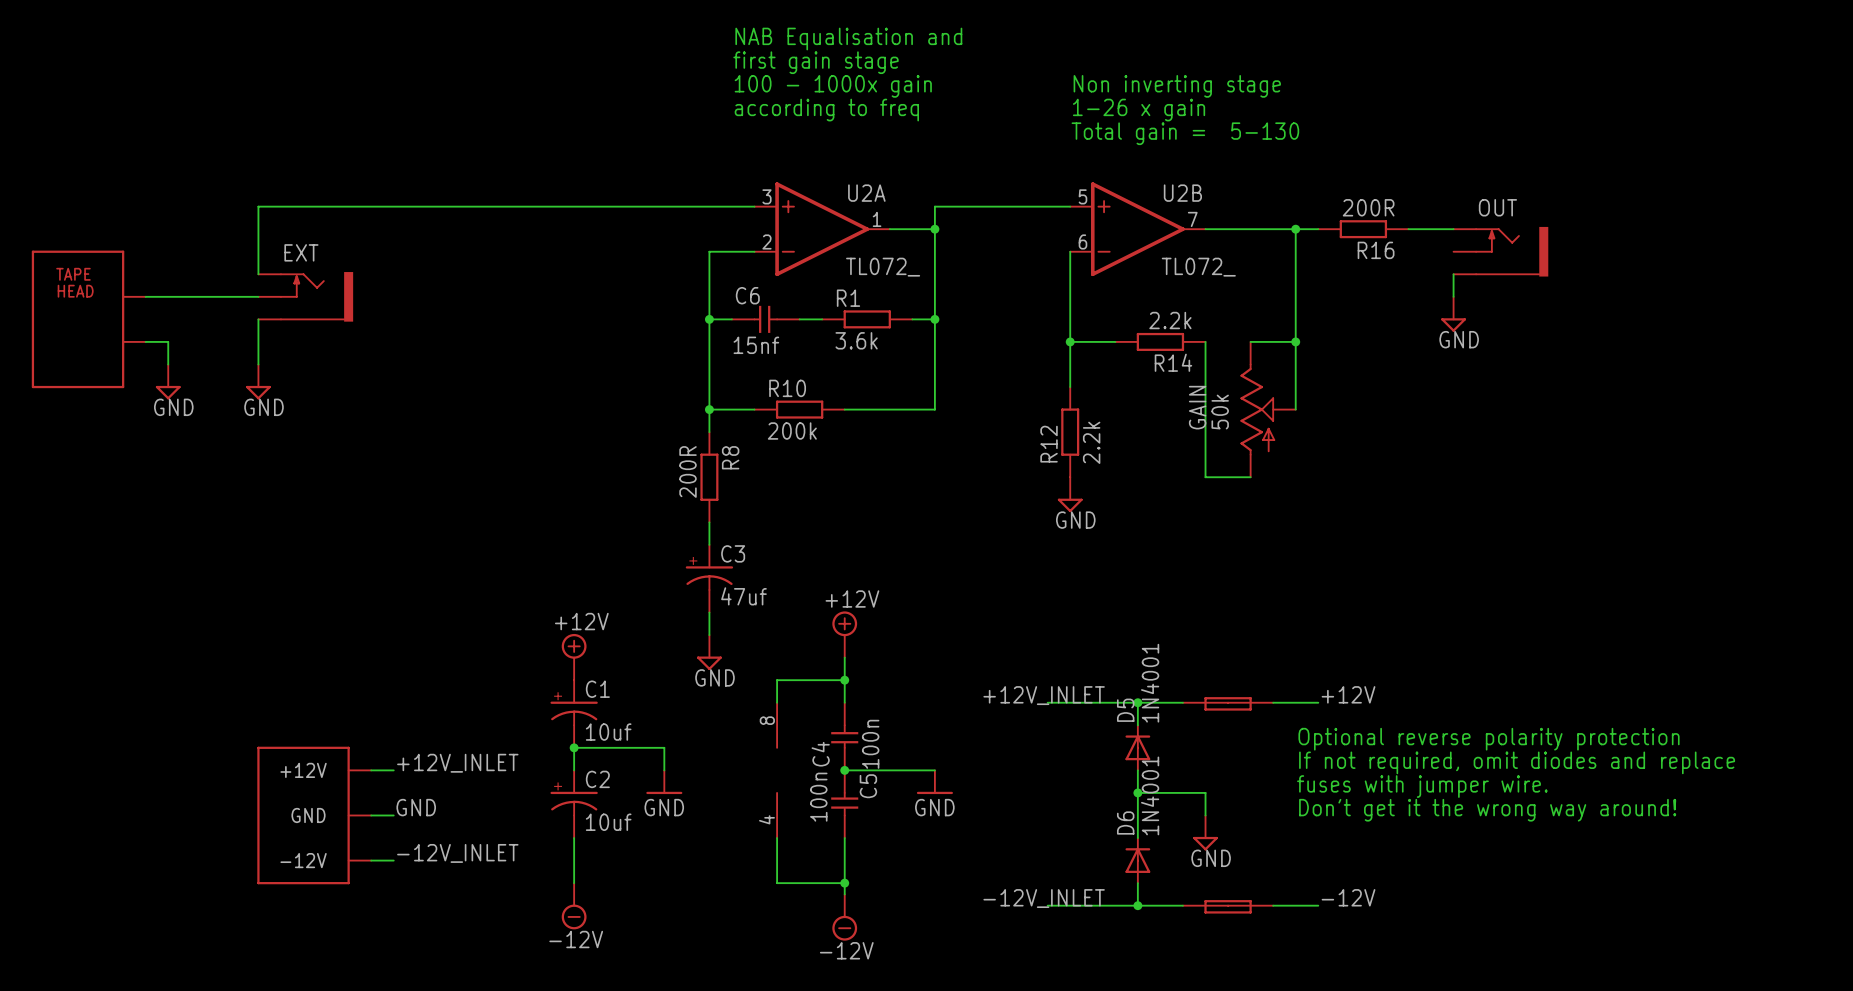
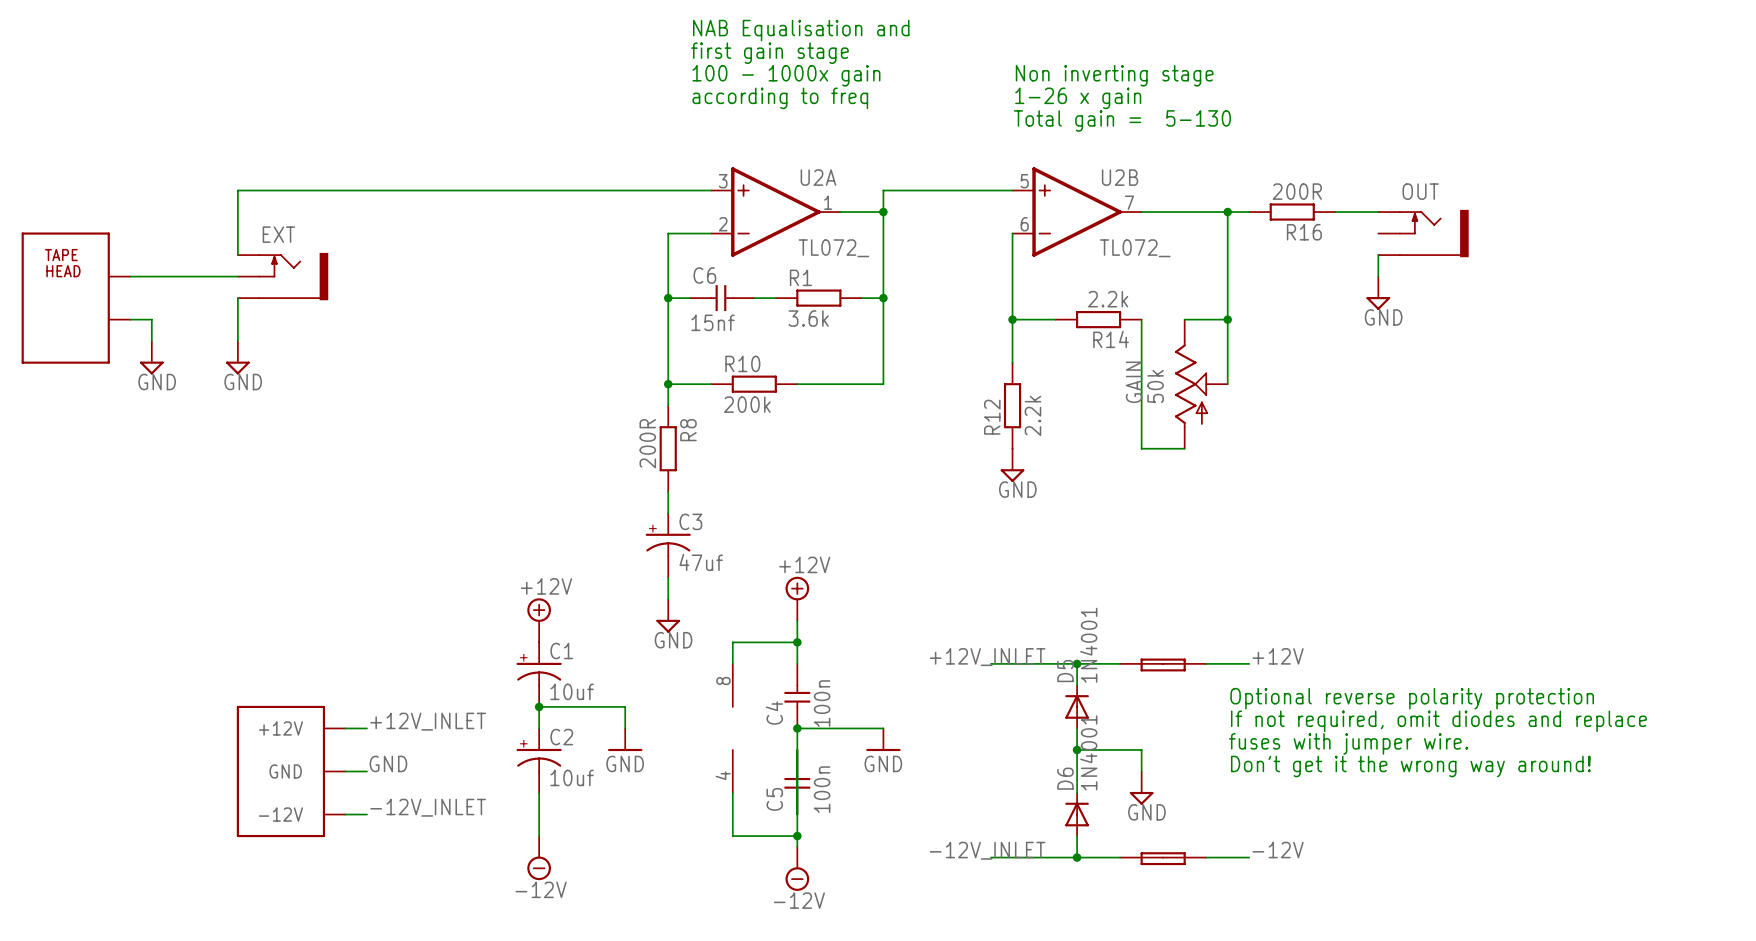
C5 rotation: 0° (844, 804) -> 180° (797, 782)

